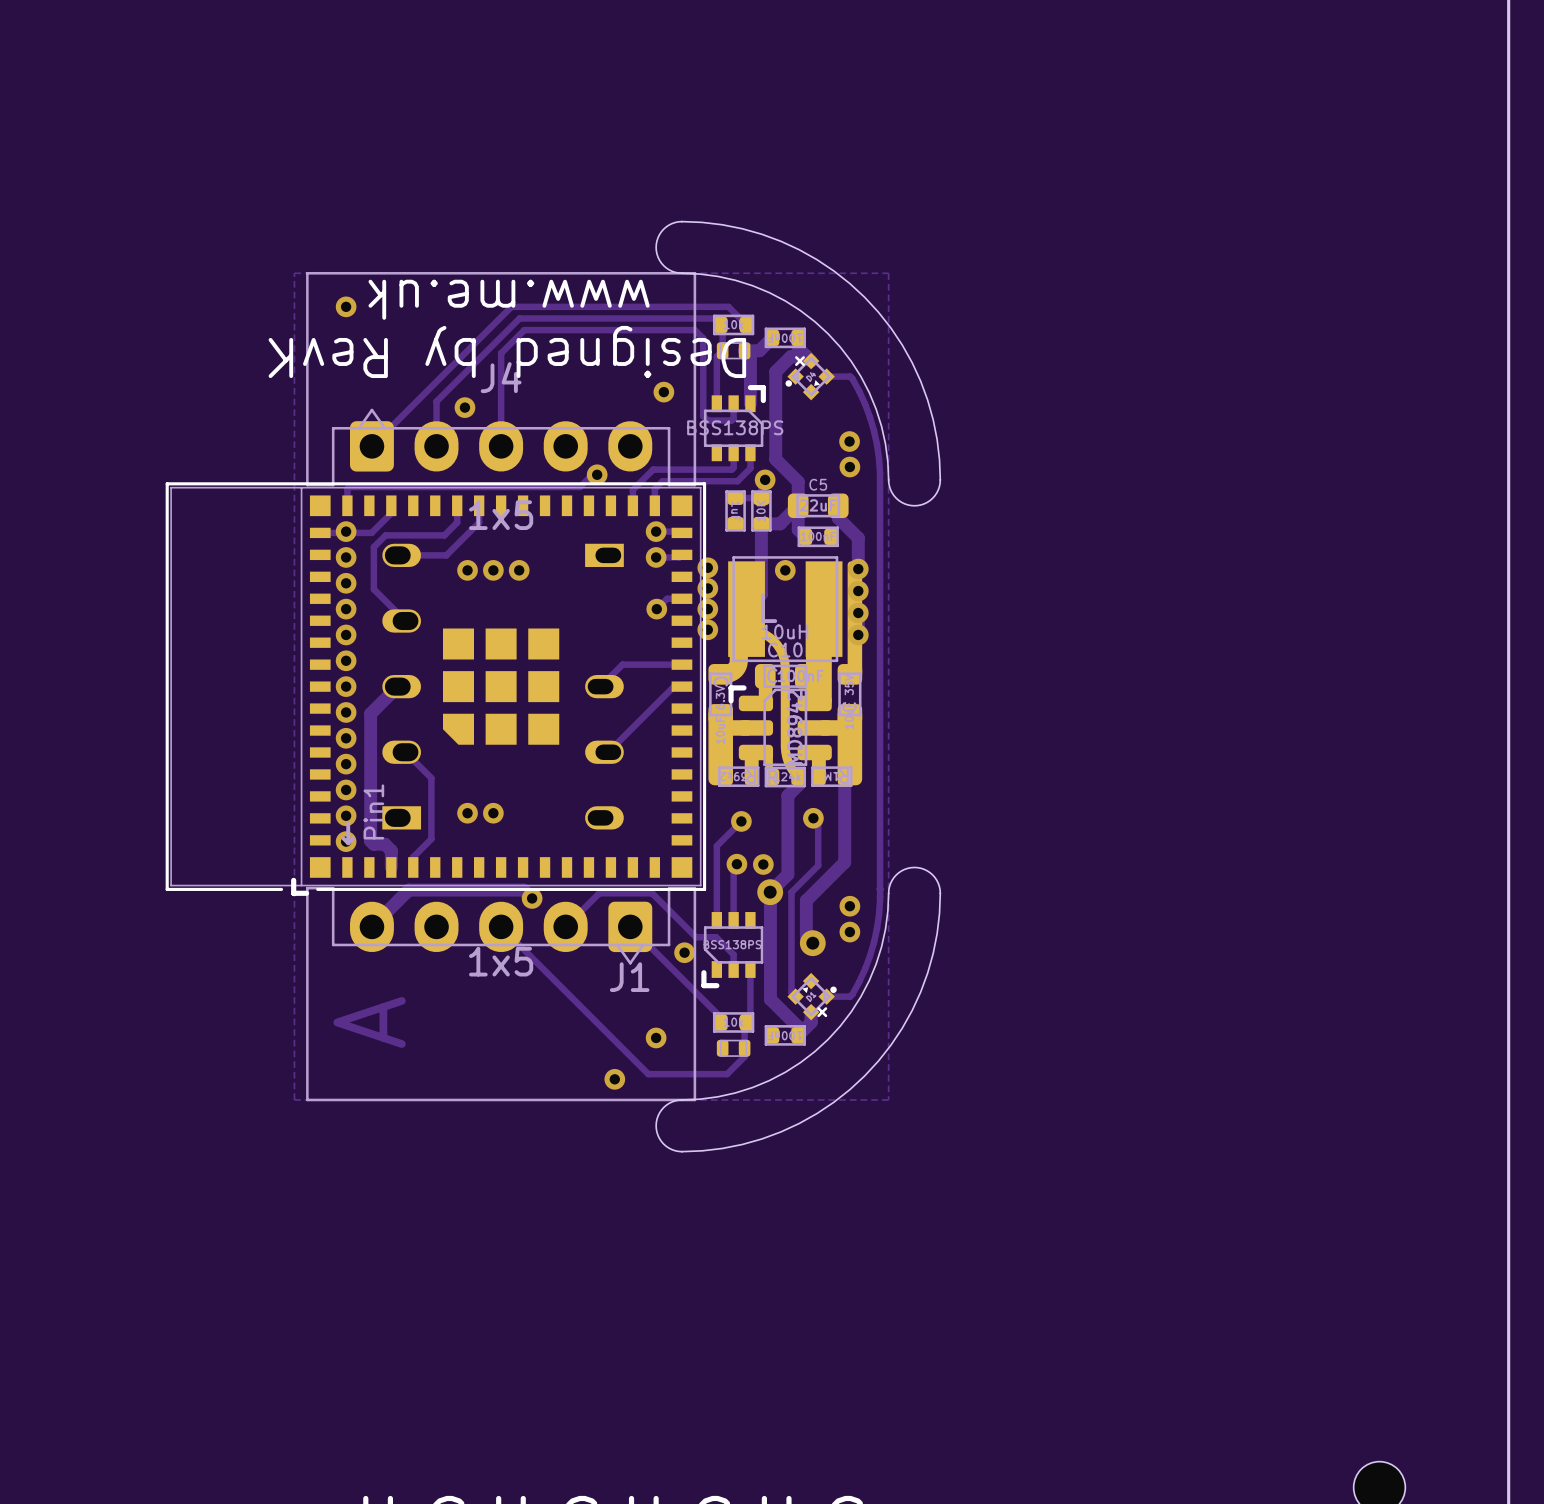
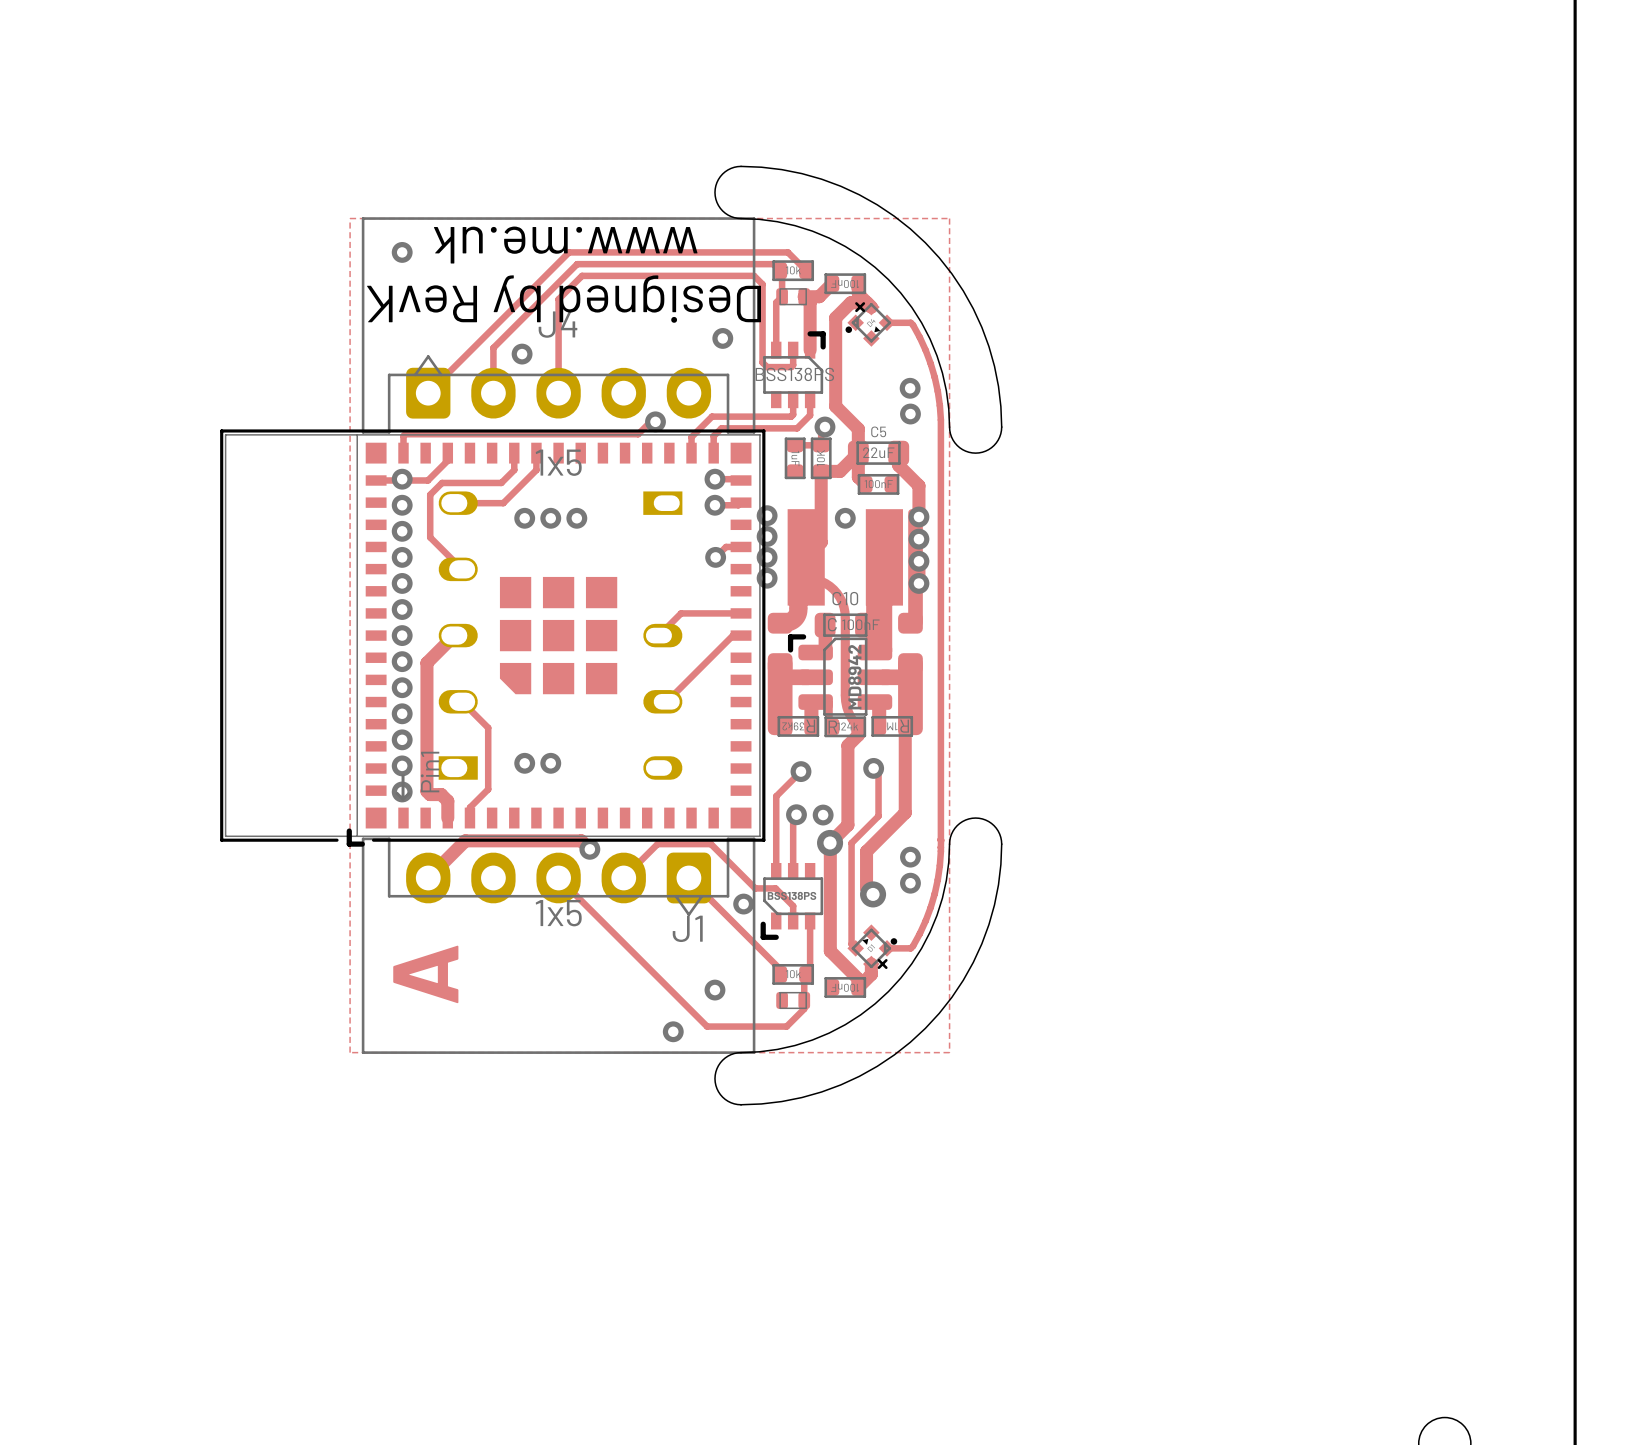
drawing: [709, 556, 862, 717] -> none

